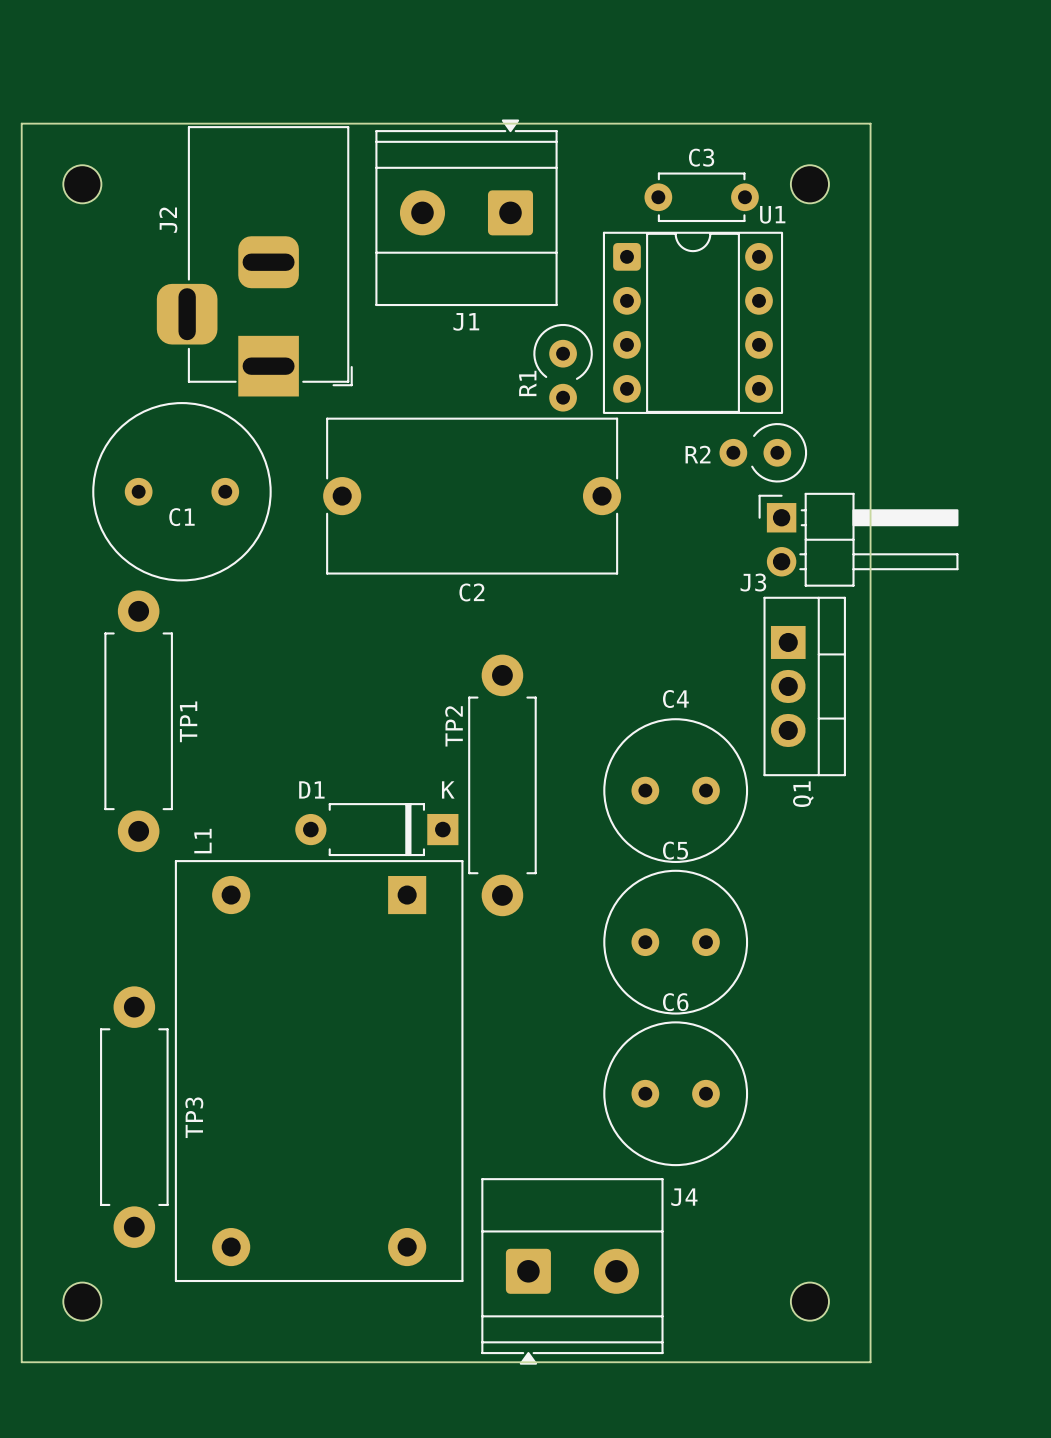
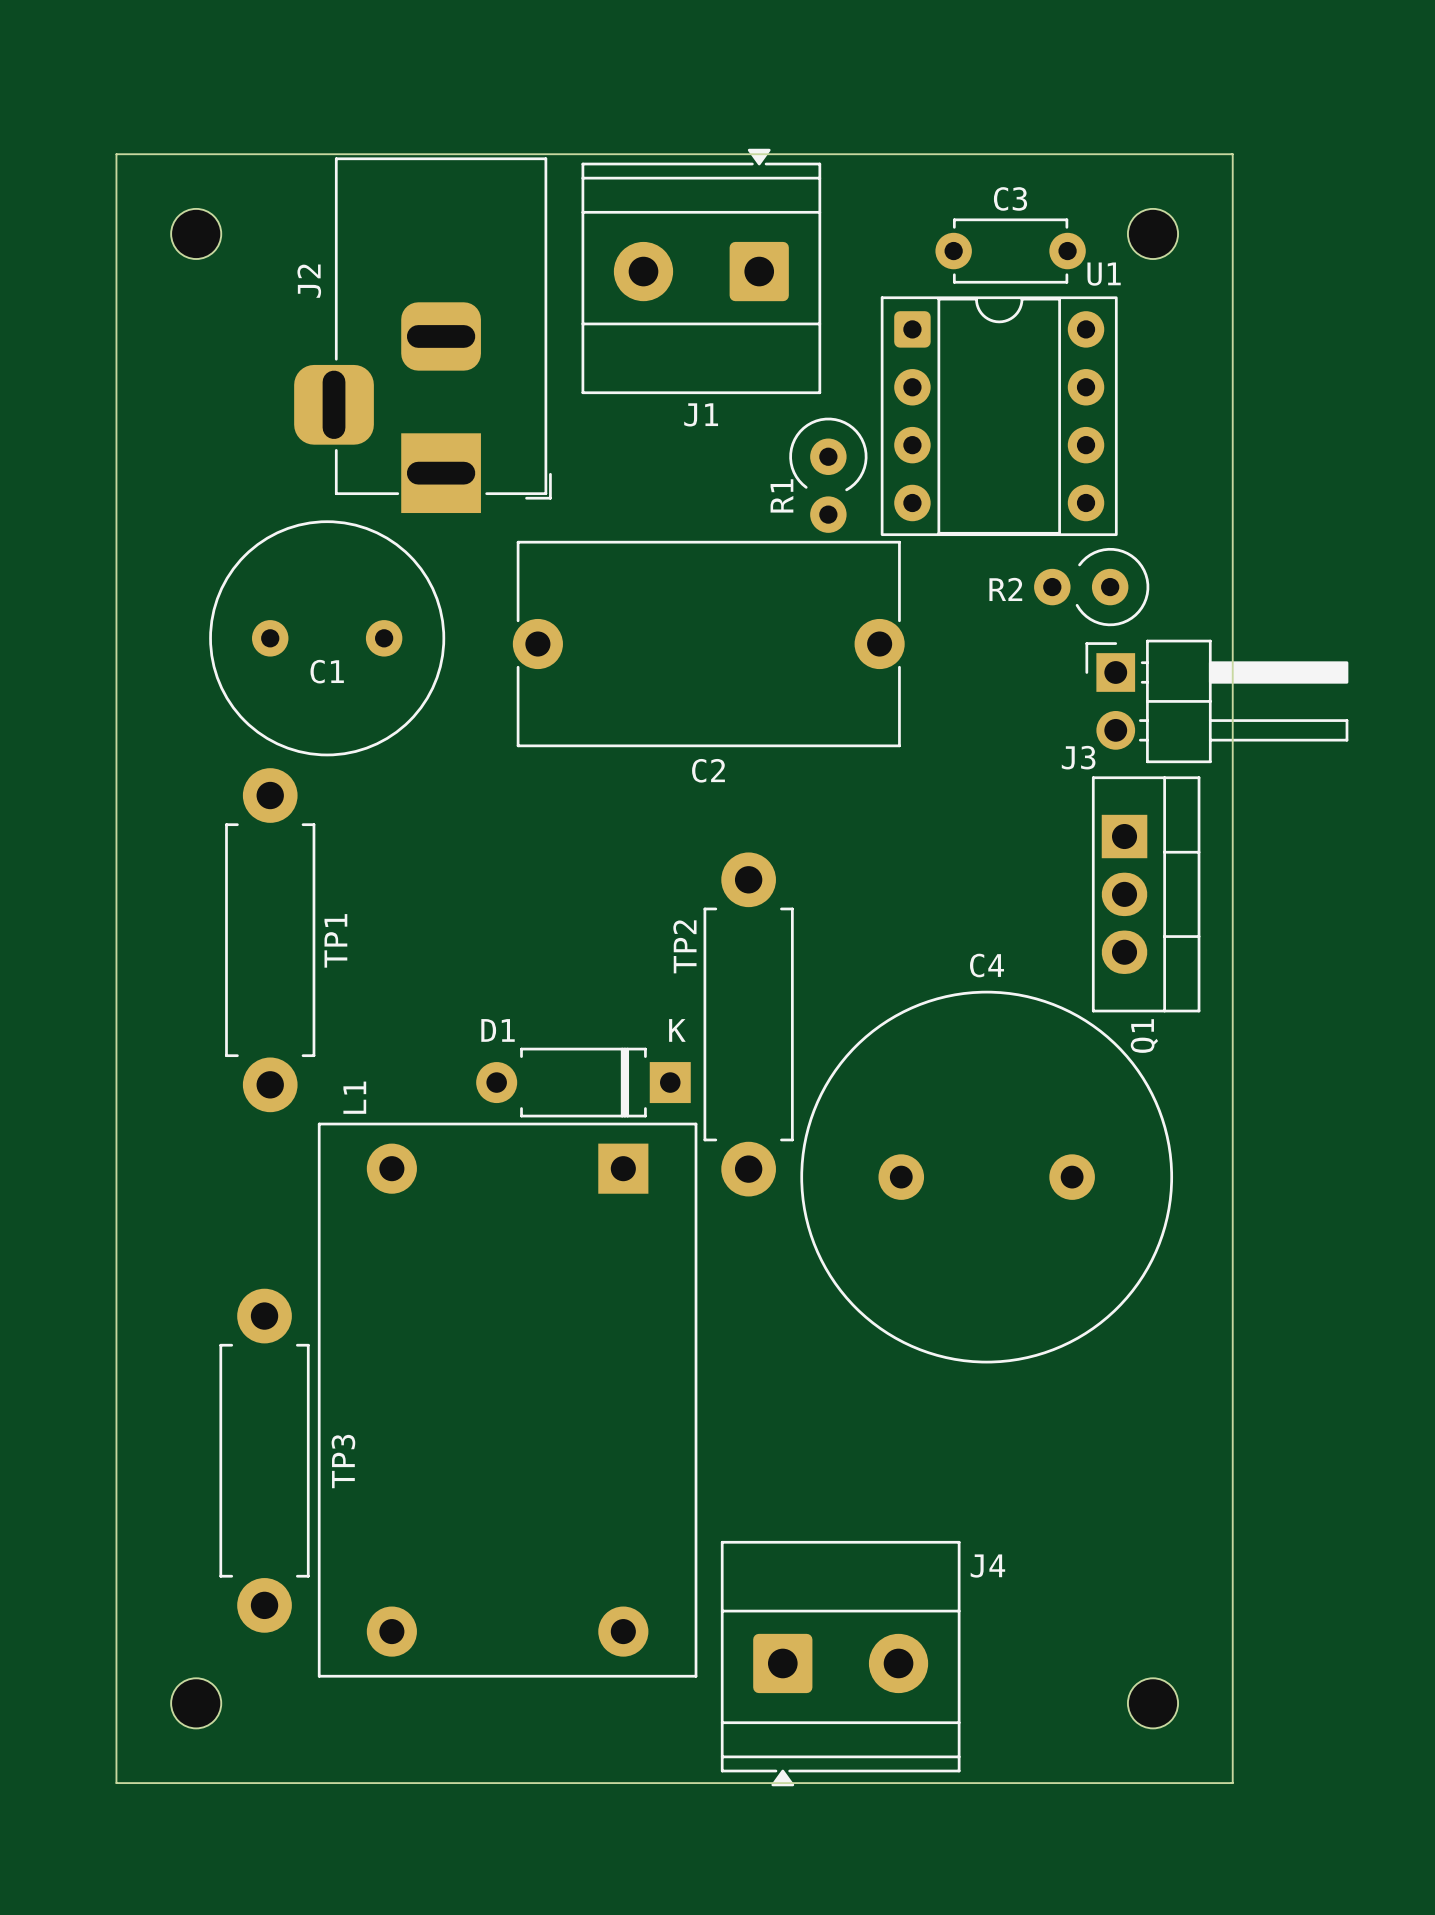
C4 name position: C4 (675, 699) -> C4 (987, 965)
C4 footprint: [603, 718, 749, 864] -> [800, 990, 1174, 1364]
C5: (675, 942) -> none
C6: (675, 1093) -> none

